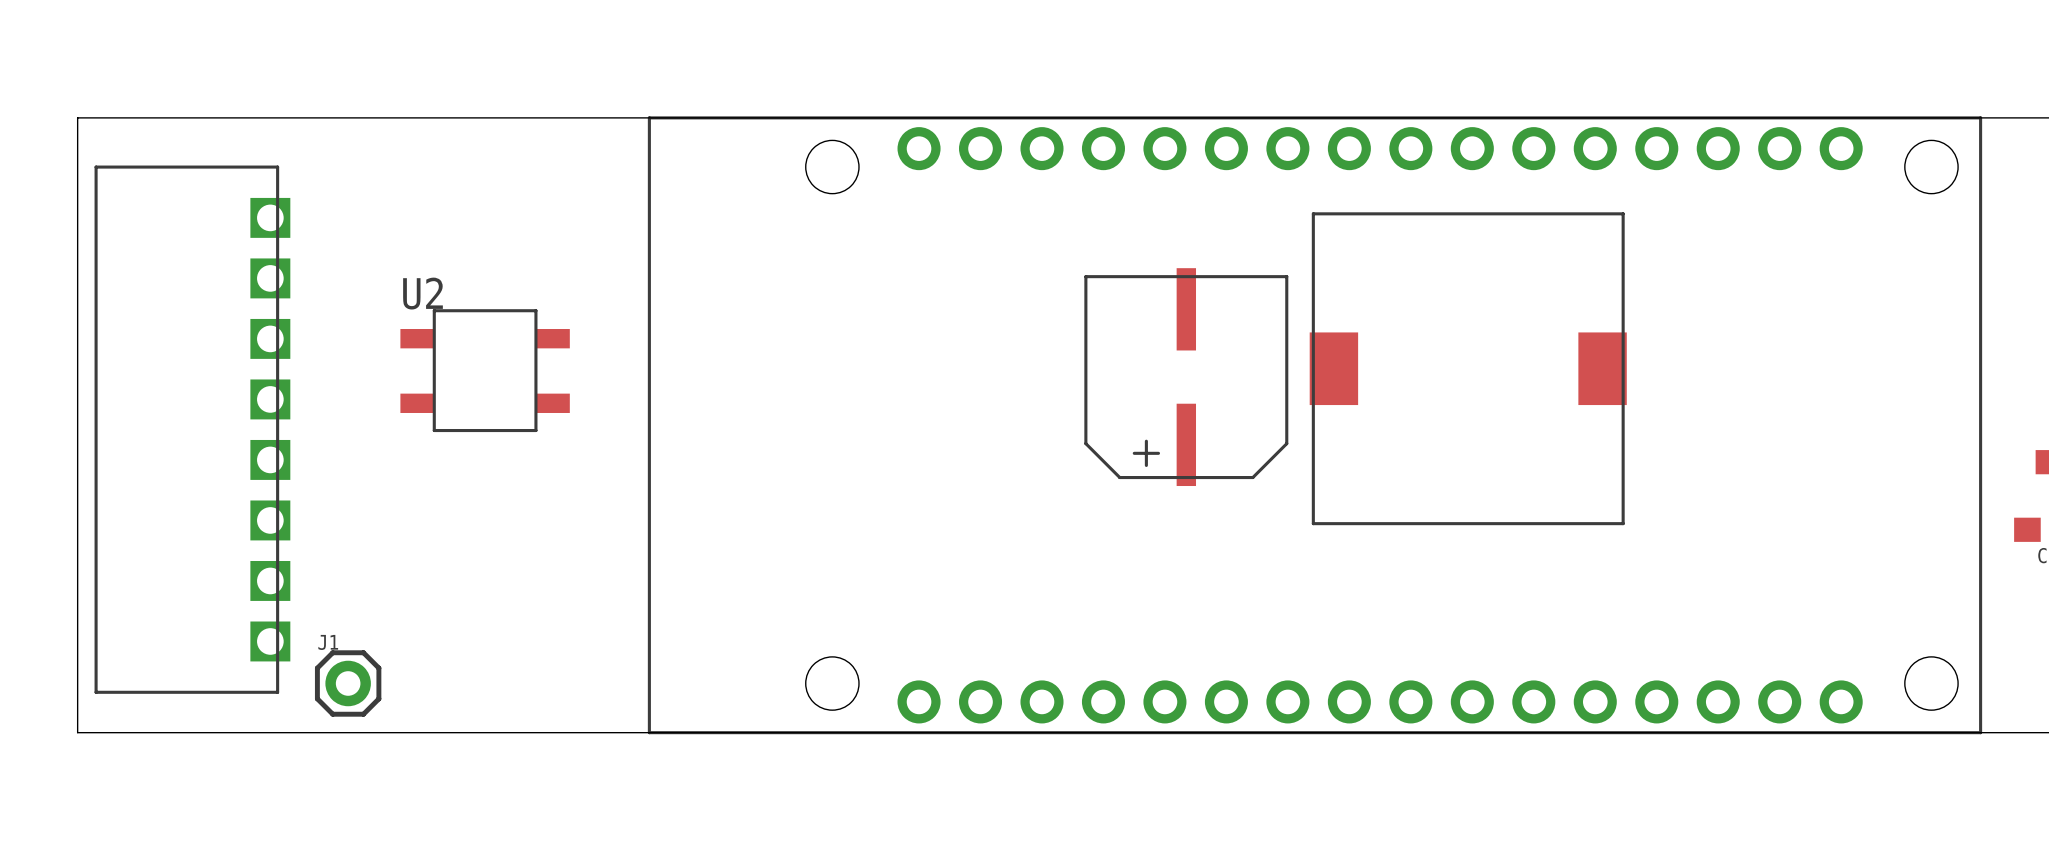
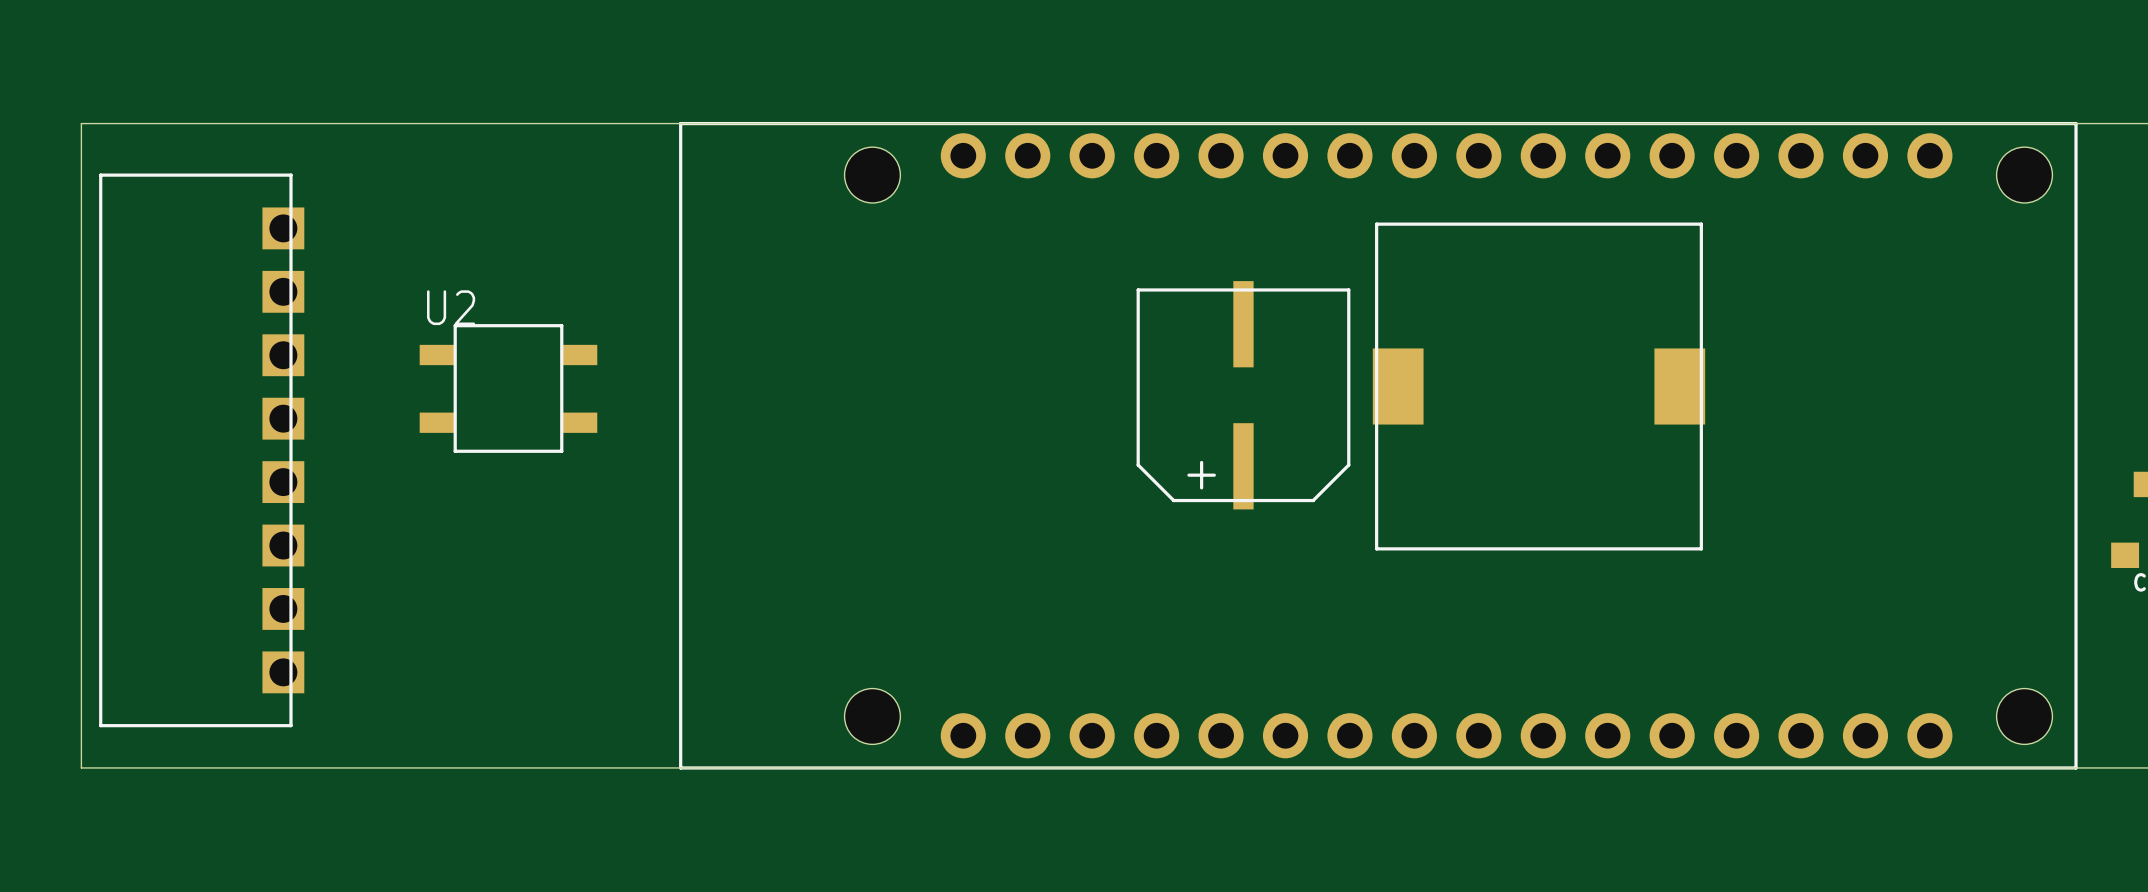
J1: (348, 683) -> none

